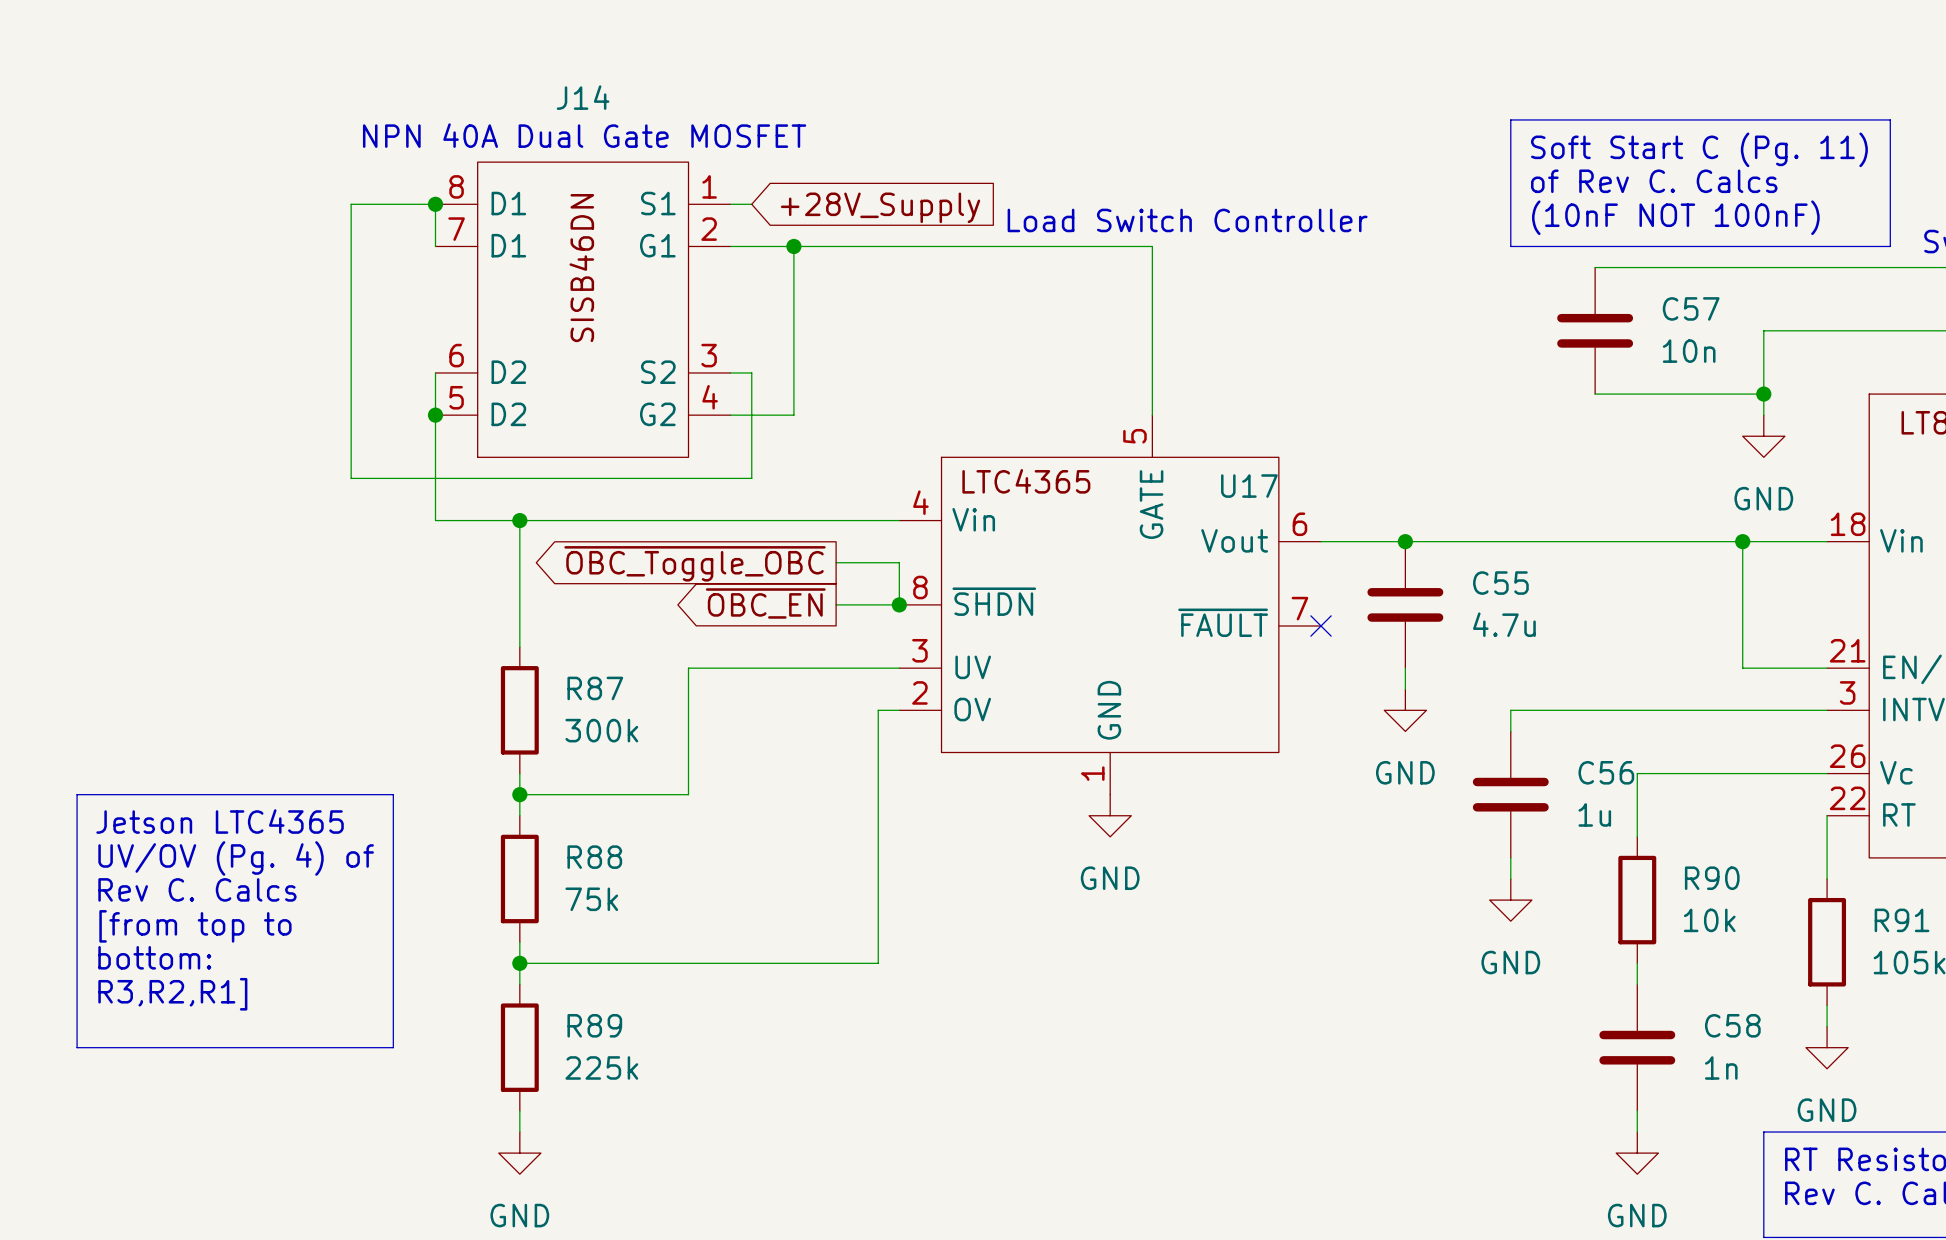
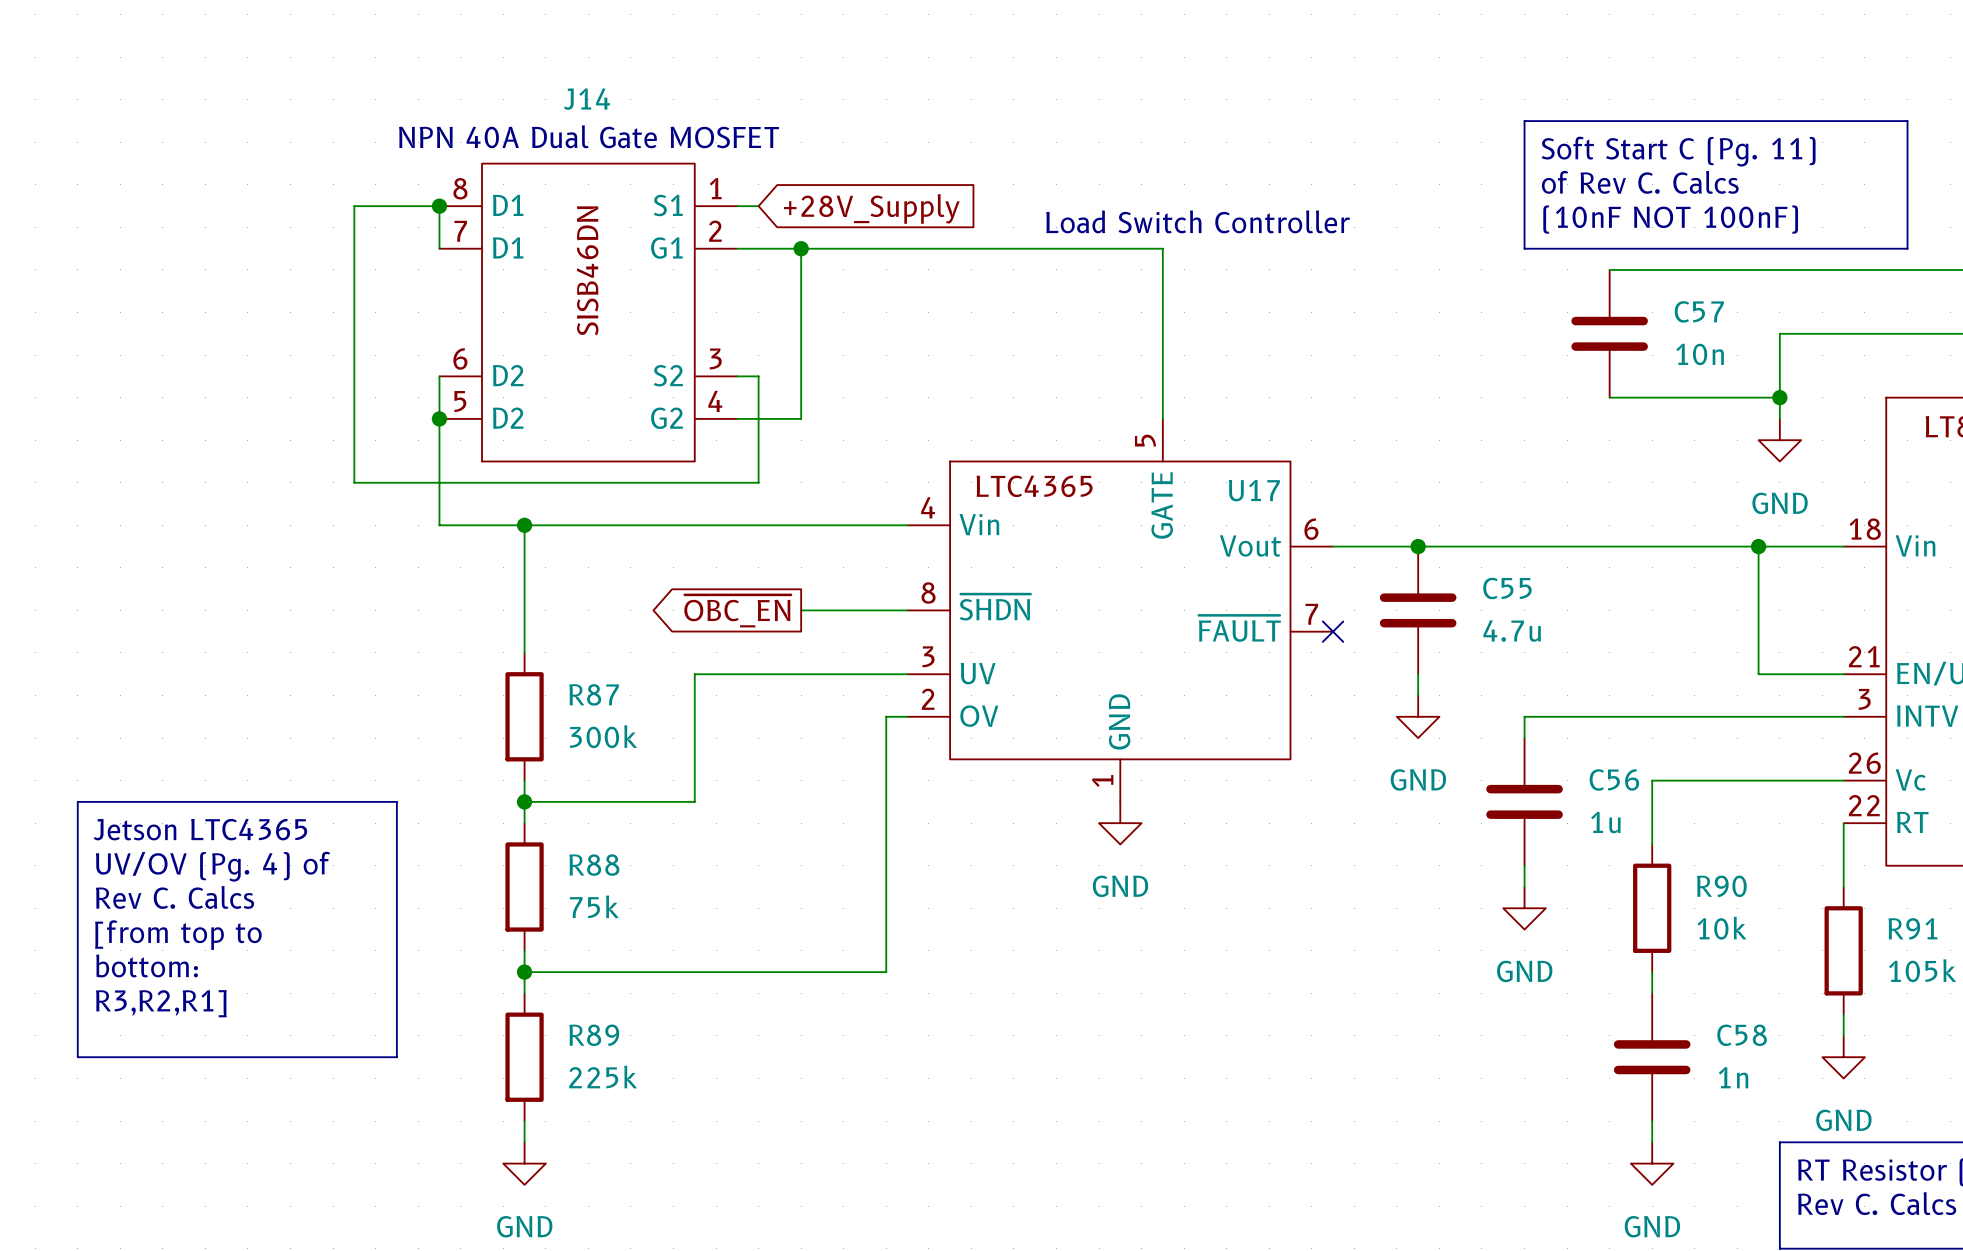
wire: (836, 562) (899, 562) (899, 604) -> none
global label: ~{OBC_Toggle_OBC} (695, 563) -> none
global label position: ~{OBC_EN} (765, 603) -> ~{OBC_EN} (737, 611)
wire: none -> (801, 610) (843, 610)
junction: (899, 604) -> none

